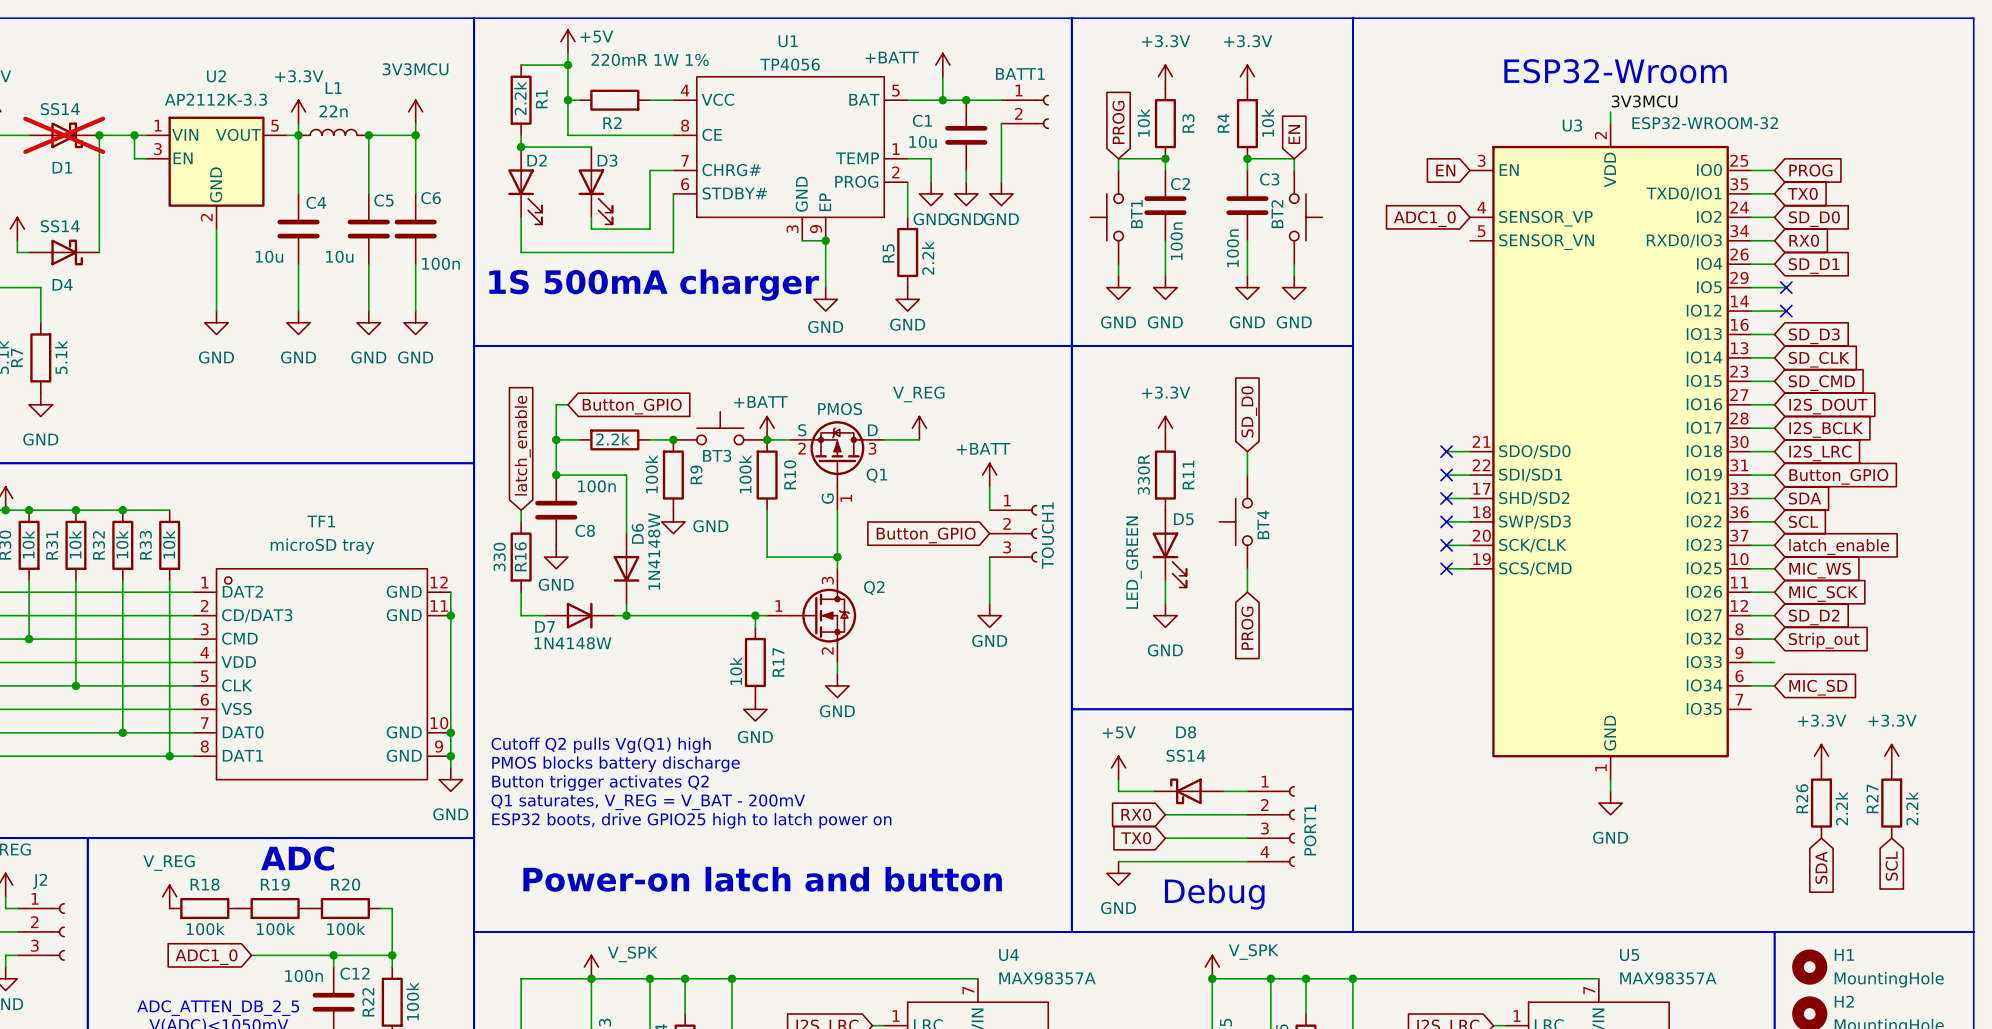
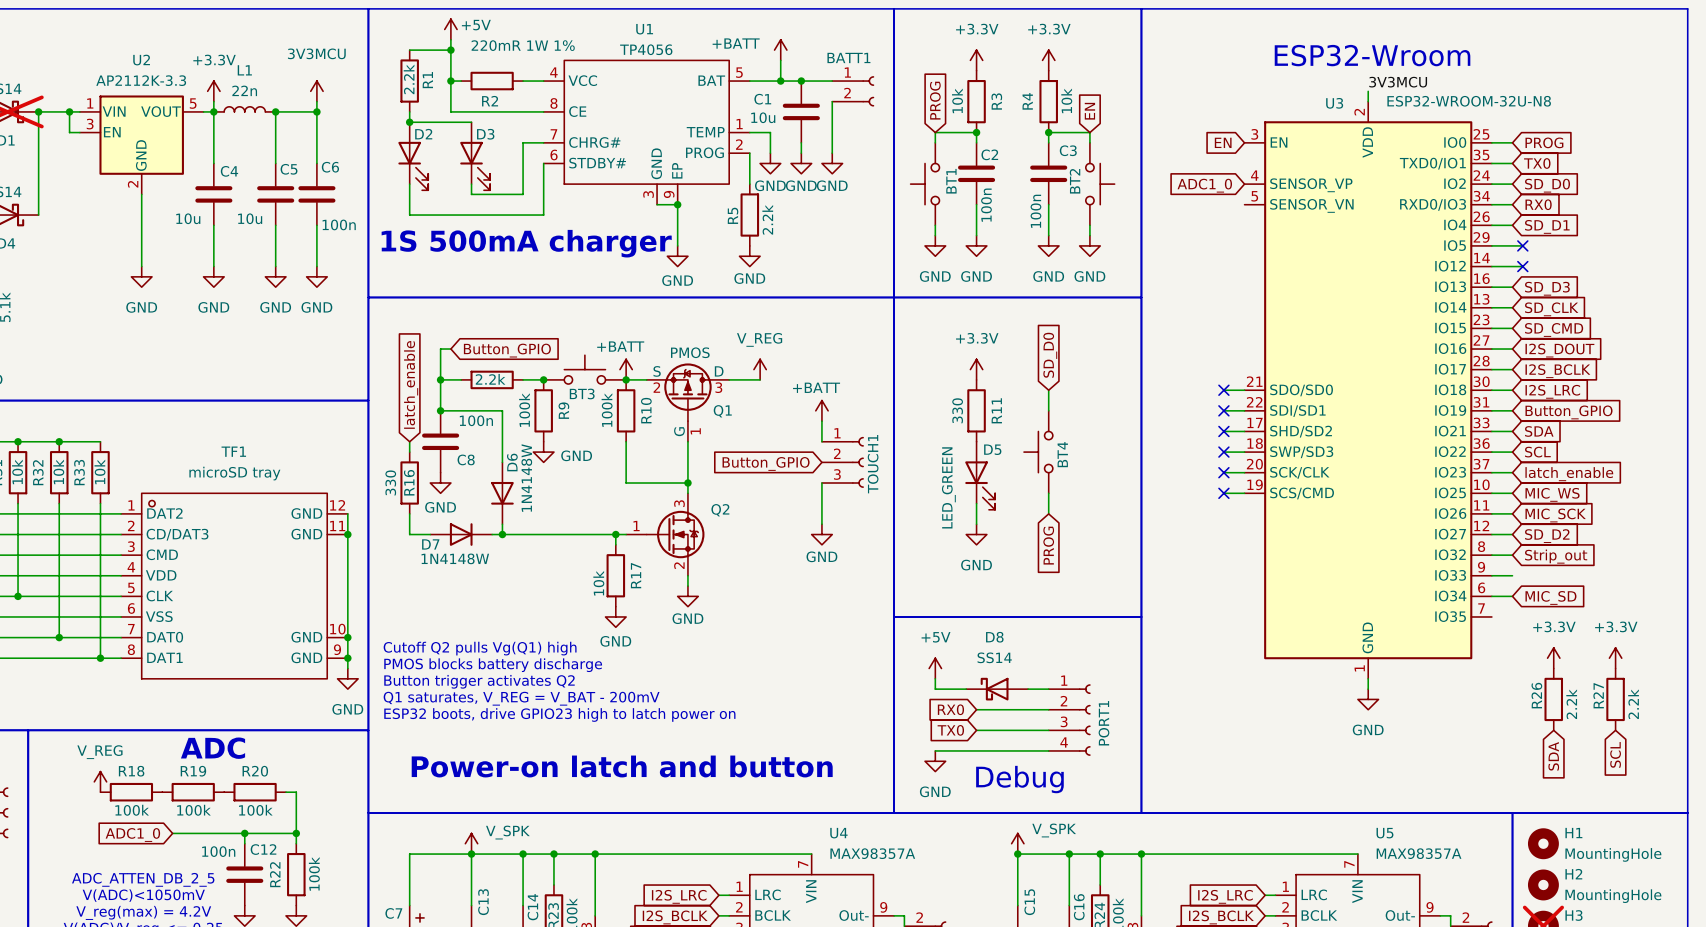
U3 value: ESP32-WROOM-32 (1705, 123) -> ESP32-WROOM-32U-N8 (1469, 101)
R11 value: 330R (1143, 474) -> 330 (957, 410)
text: ESP32 boots, drive GPIO25 high to latch power on (691, 820) -> ESP32 boots, drive GPIO23 high to latch power on (559, 714)

